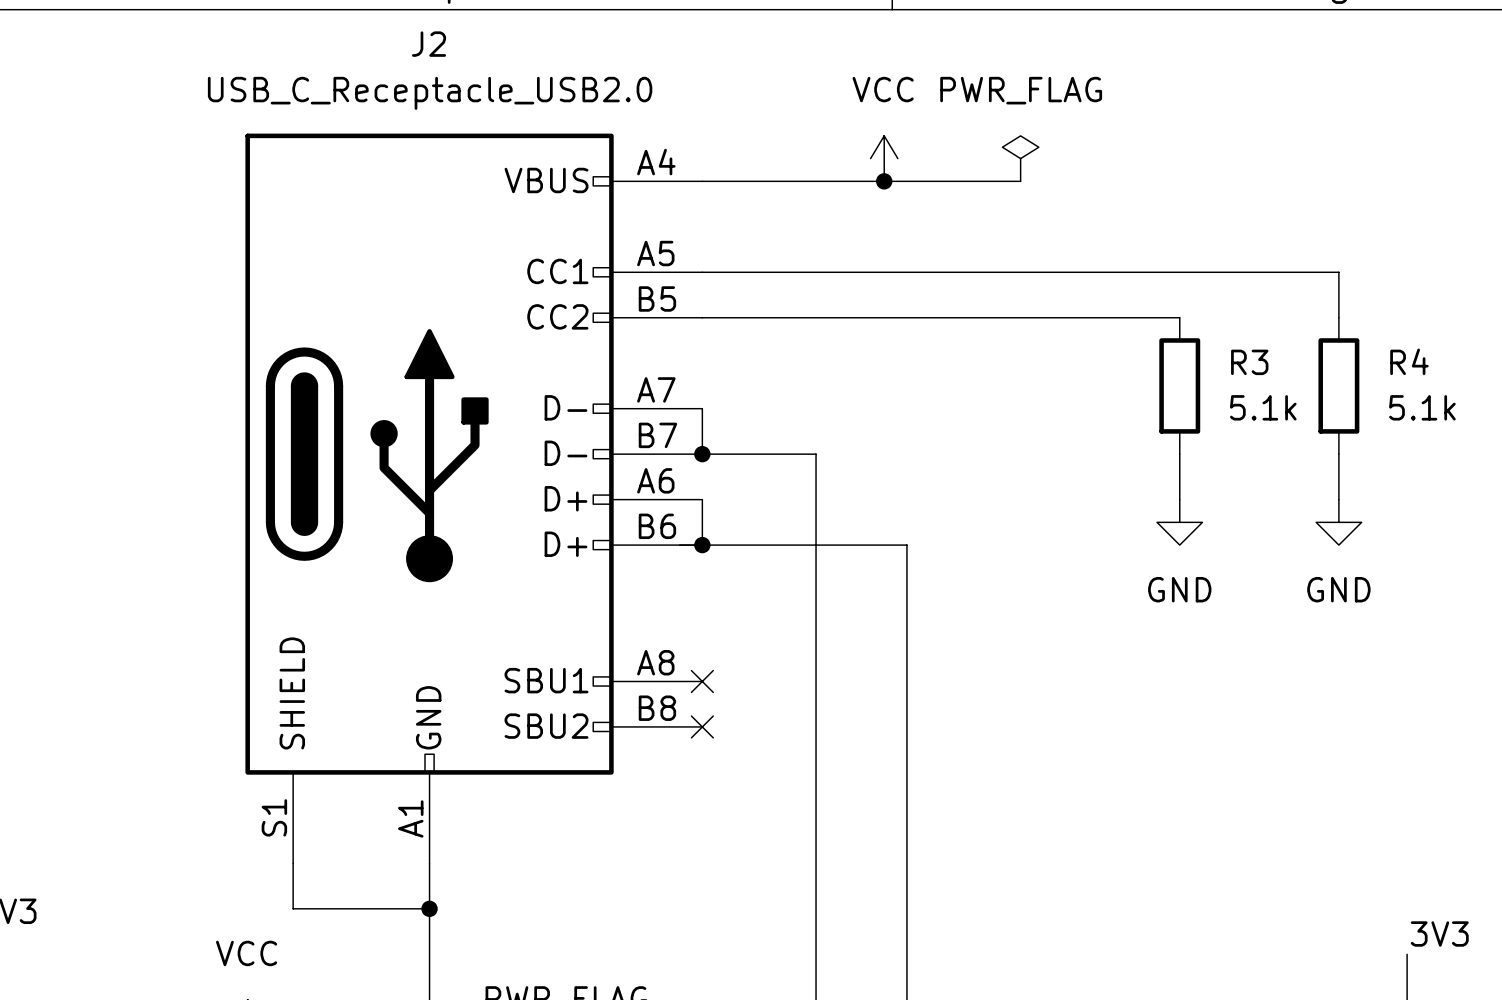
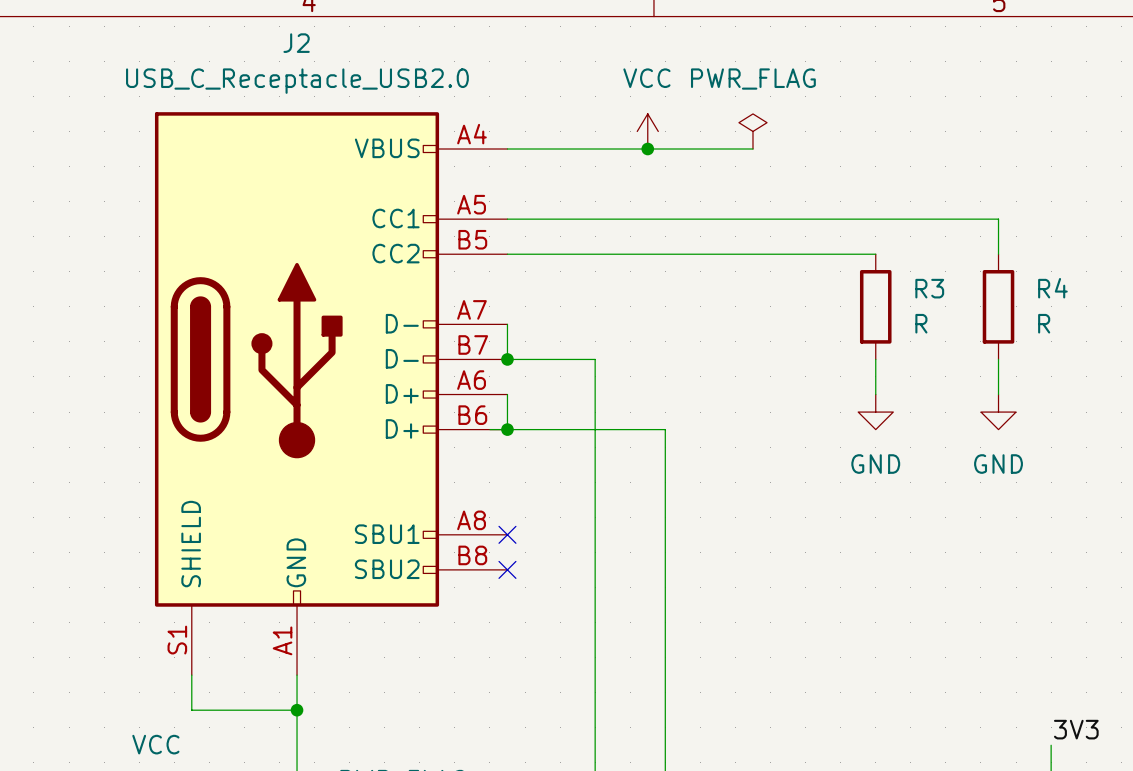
R3 value: 5.1k (1263, 407) -> R (921, 323)
R4 value: 5.1k (1422, 407) -> R (1044, 323)

